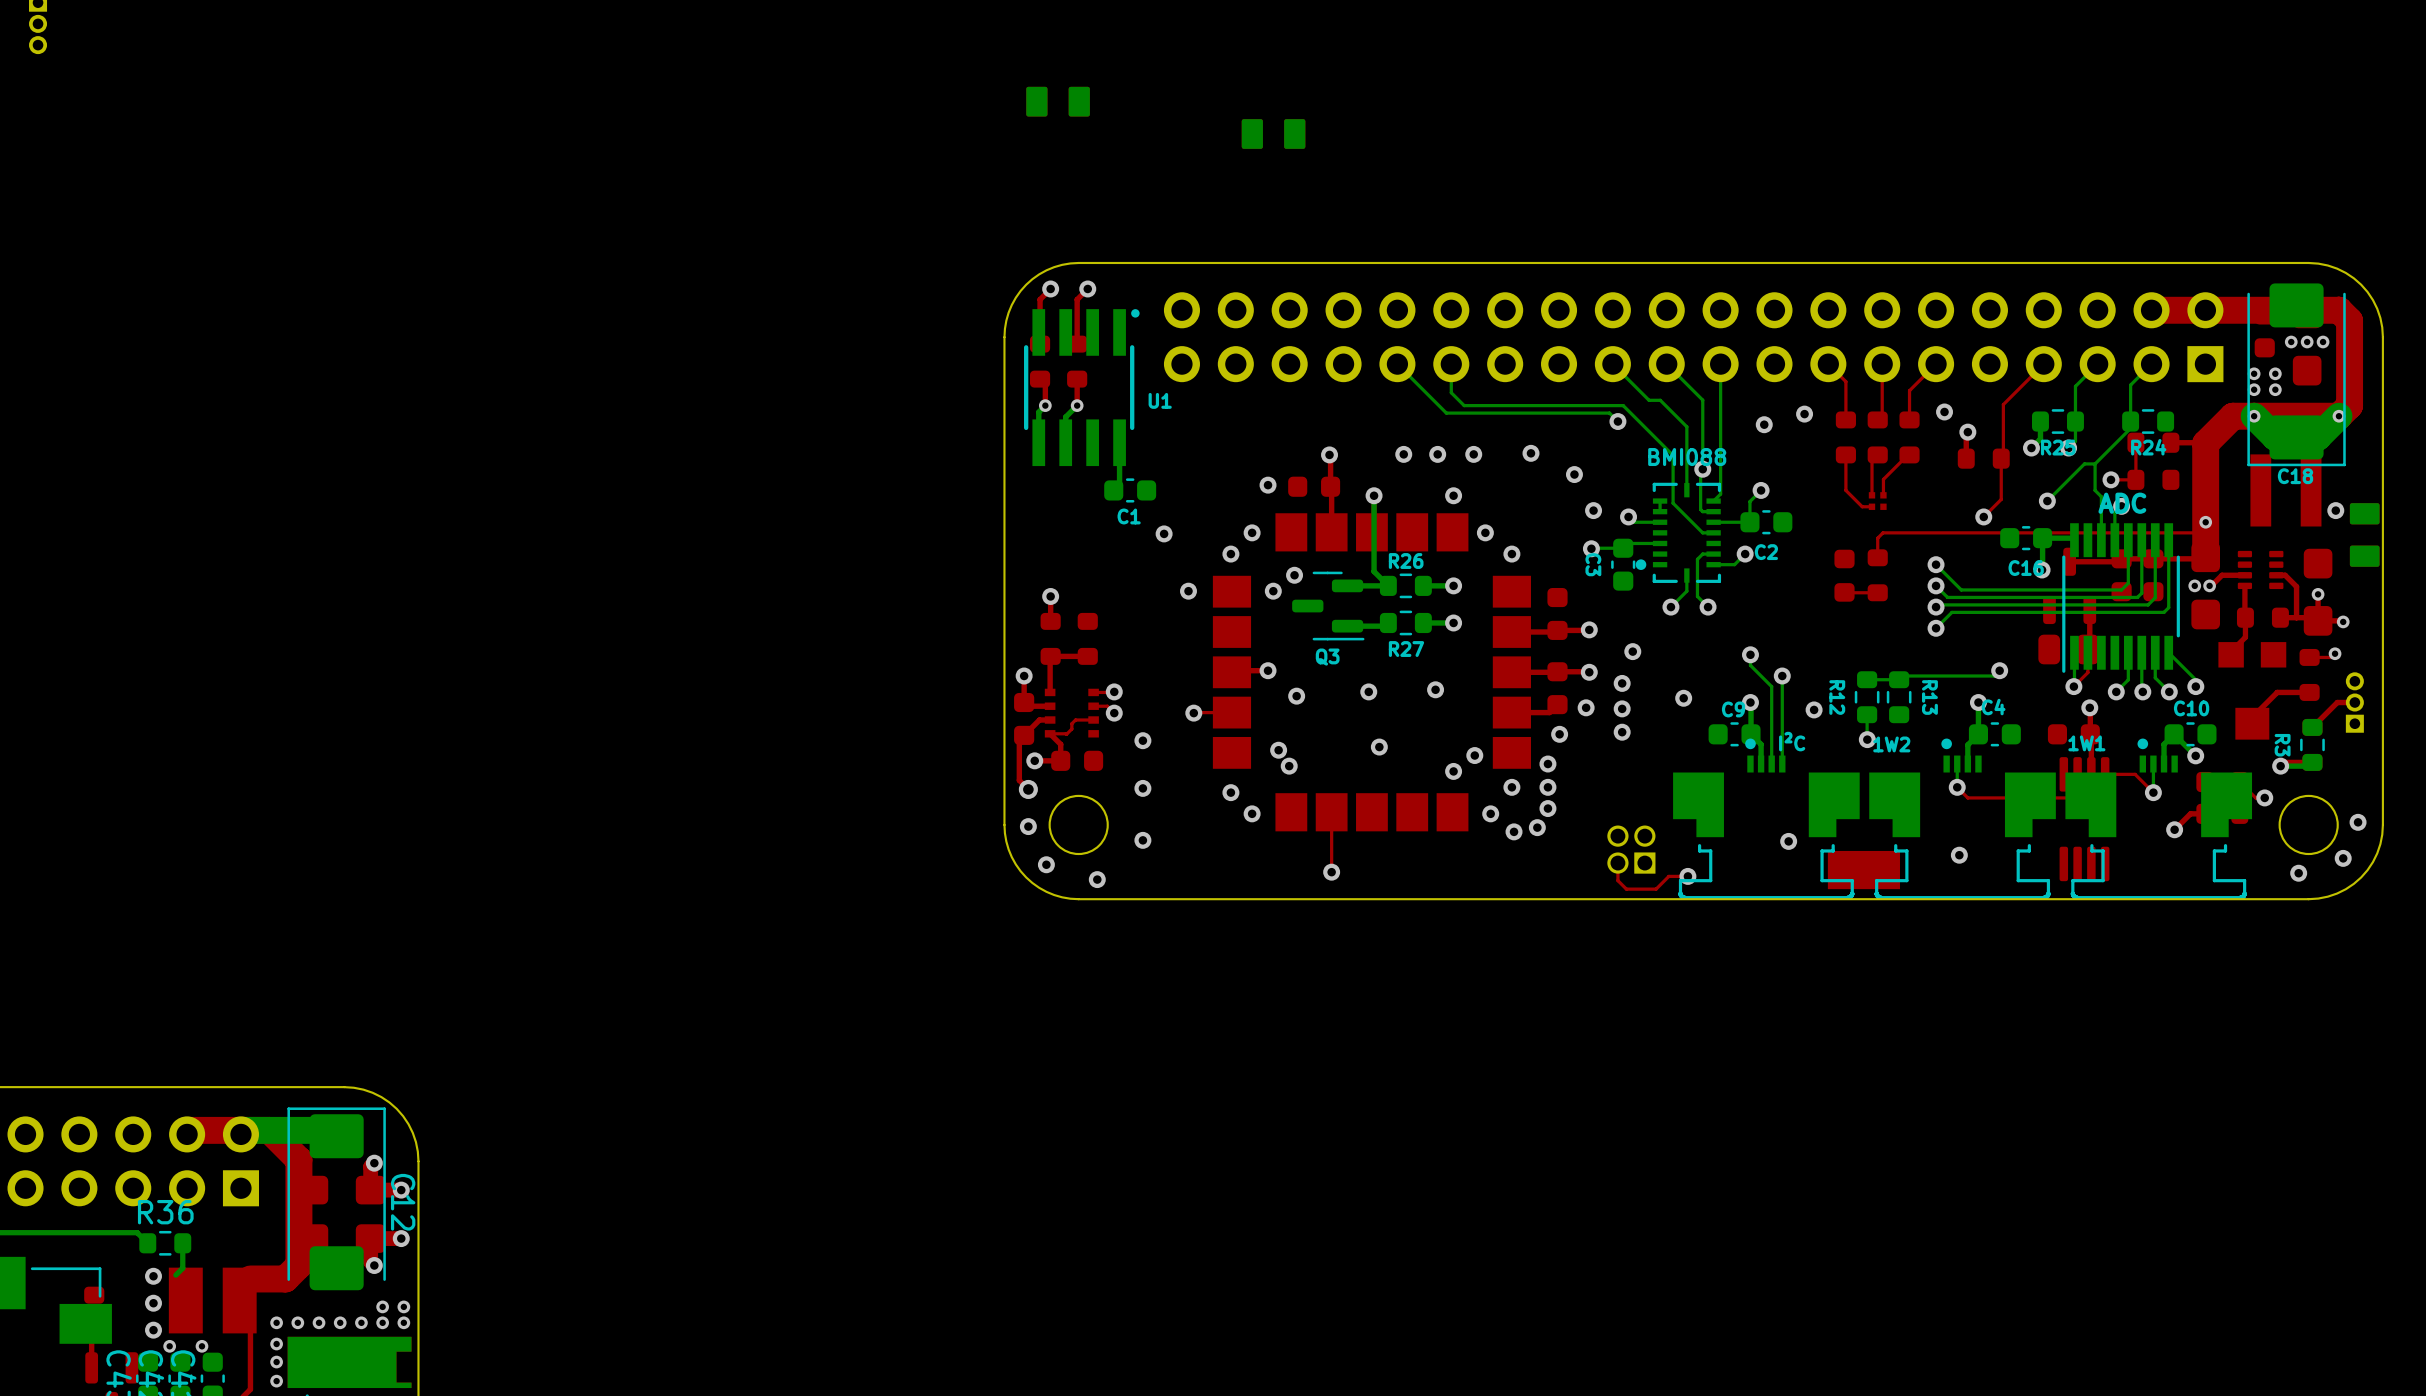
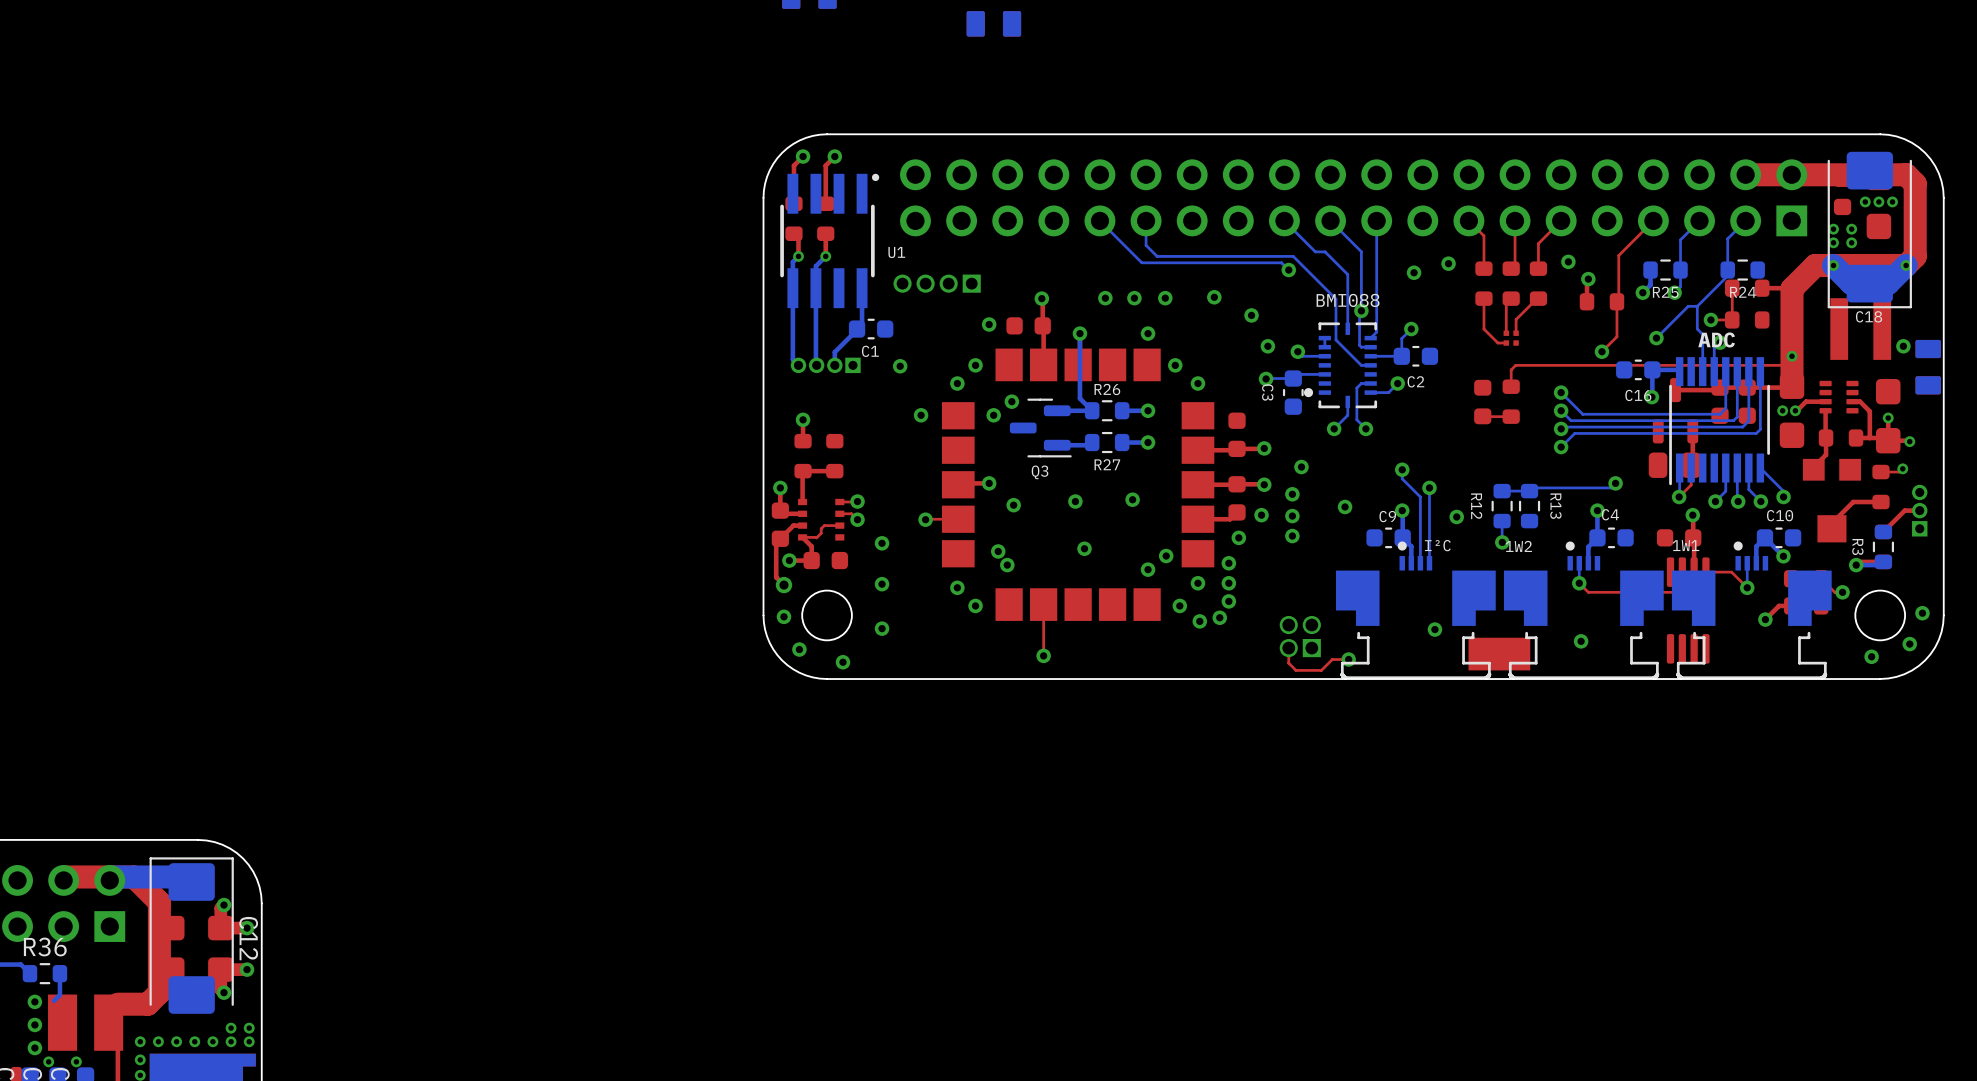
part: none -> (937, 283)
bottom track: none -> (792, 288) (792, 359) (798, 365)
bottom track: none -> (815, 288) (816, 365)
bottom track: none -> (862, 324) (834, 352) (834, 365)
part: none -> (825, 365)

